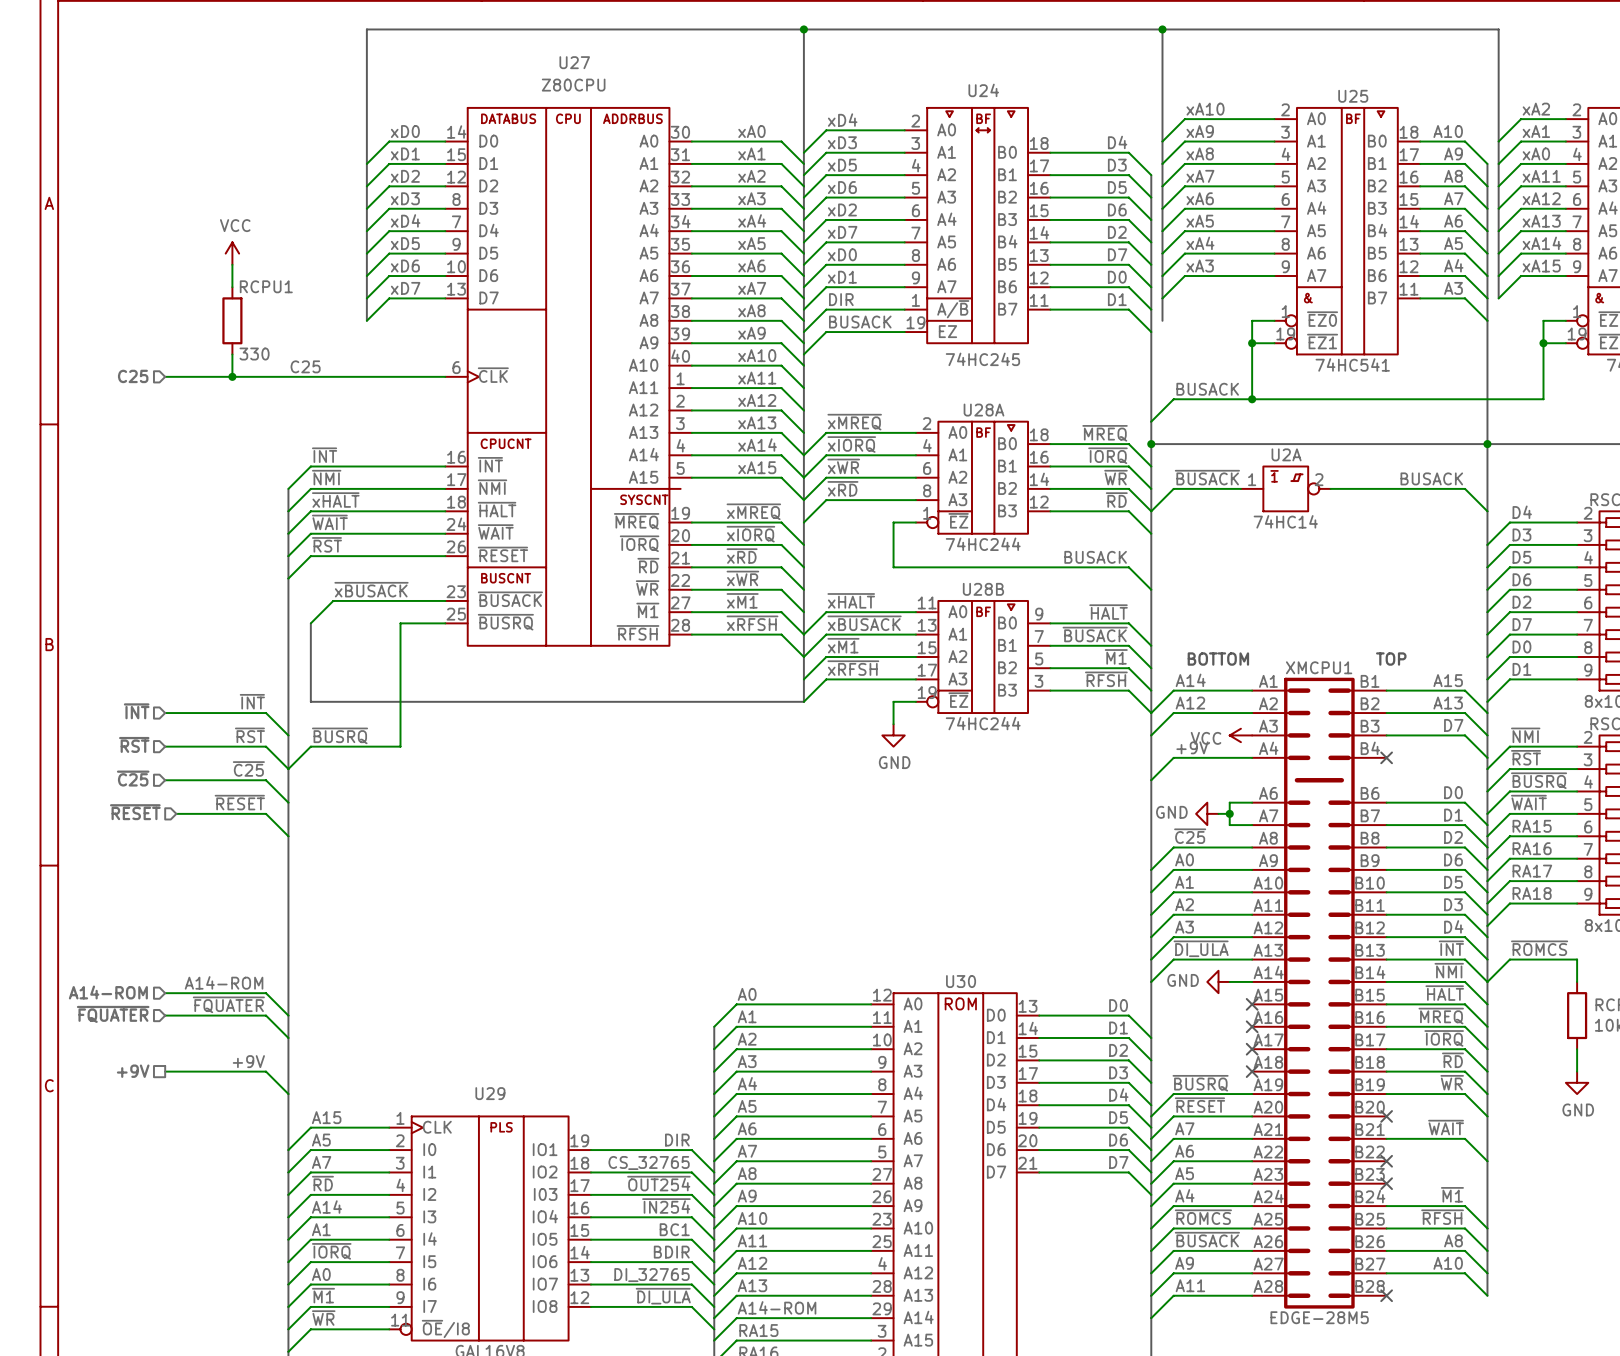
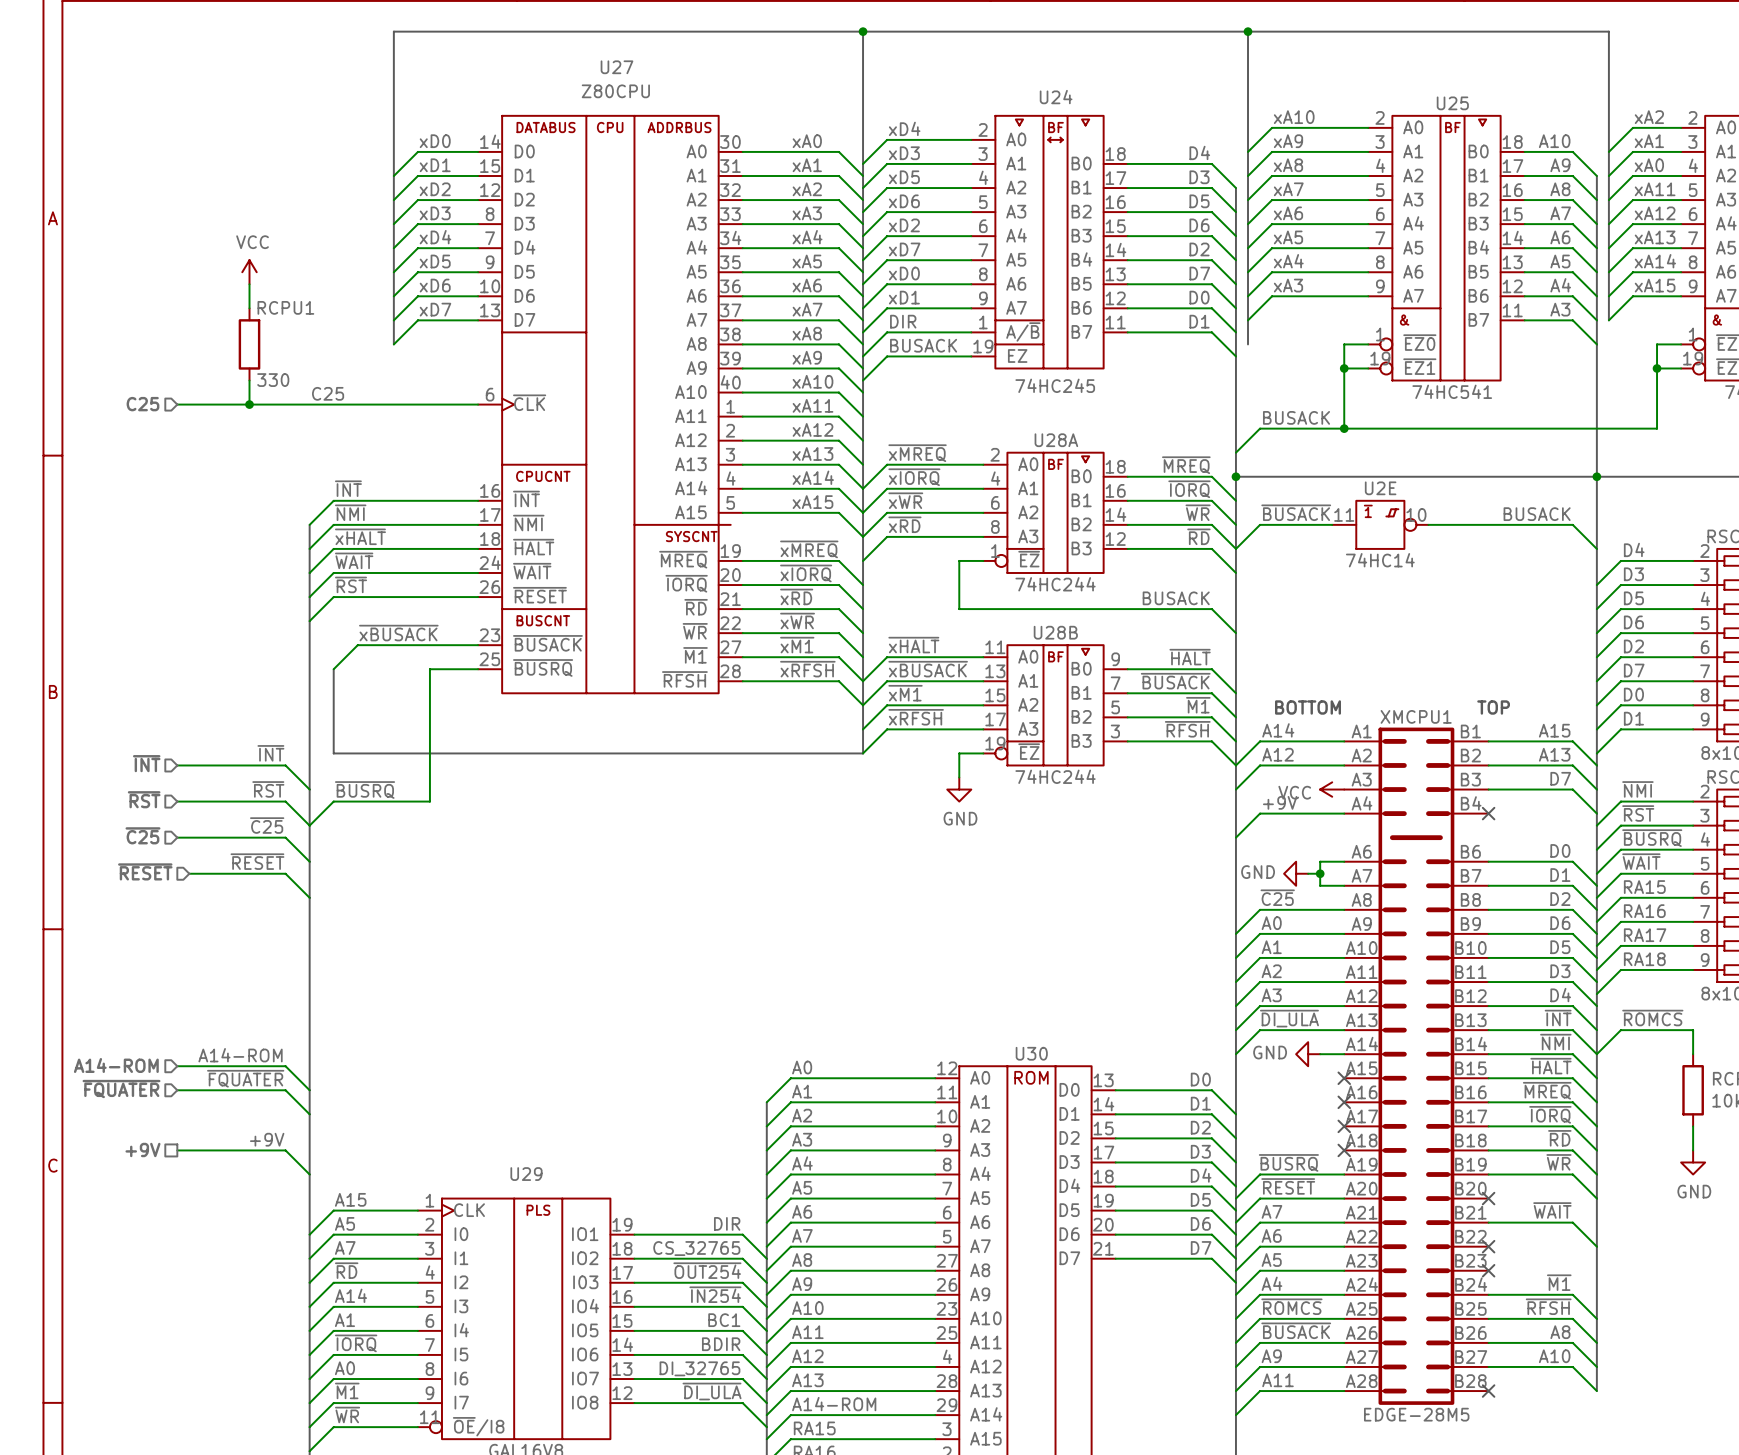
U2A name: U2A (1286, 454) -> U2E (1380, 488)
U2A pin number: 1 (1252, 479) -> 11 (1344, 514)
U2A pin number: 2 (1319, 479) -> 10 (1416, 514)

